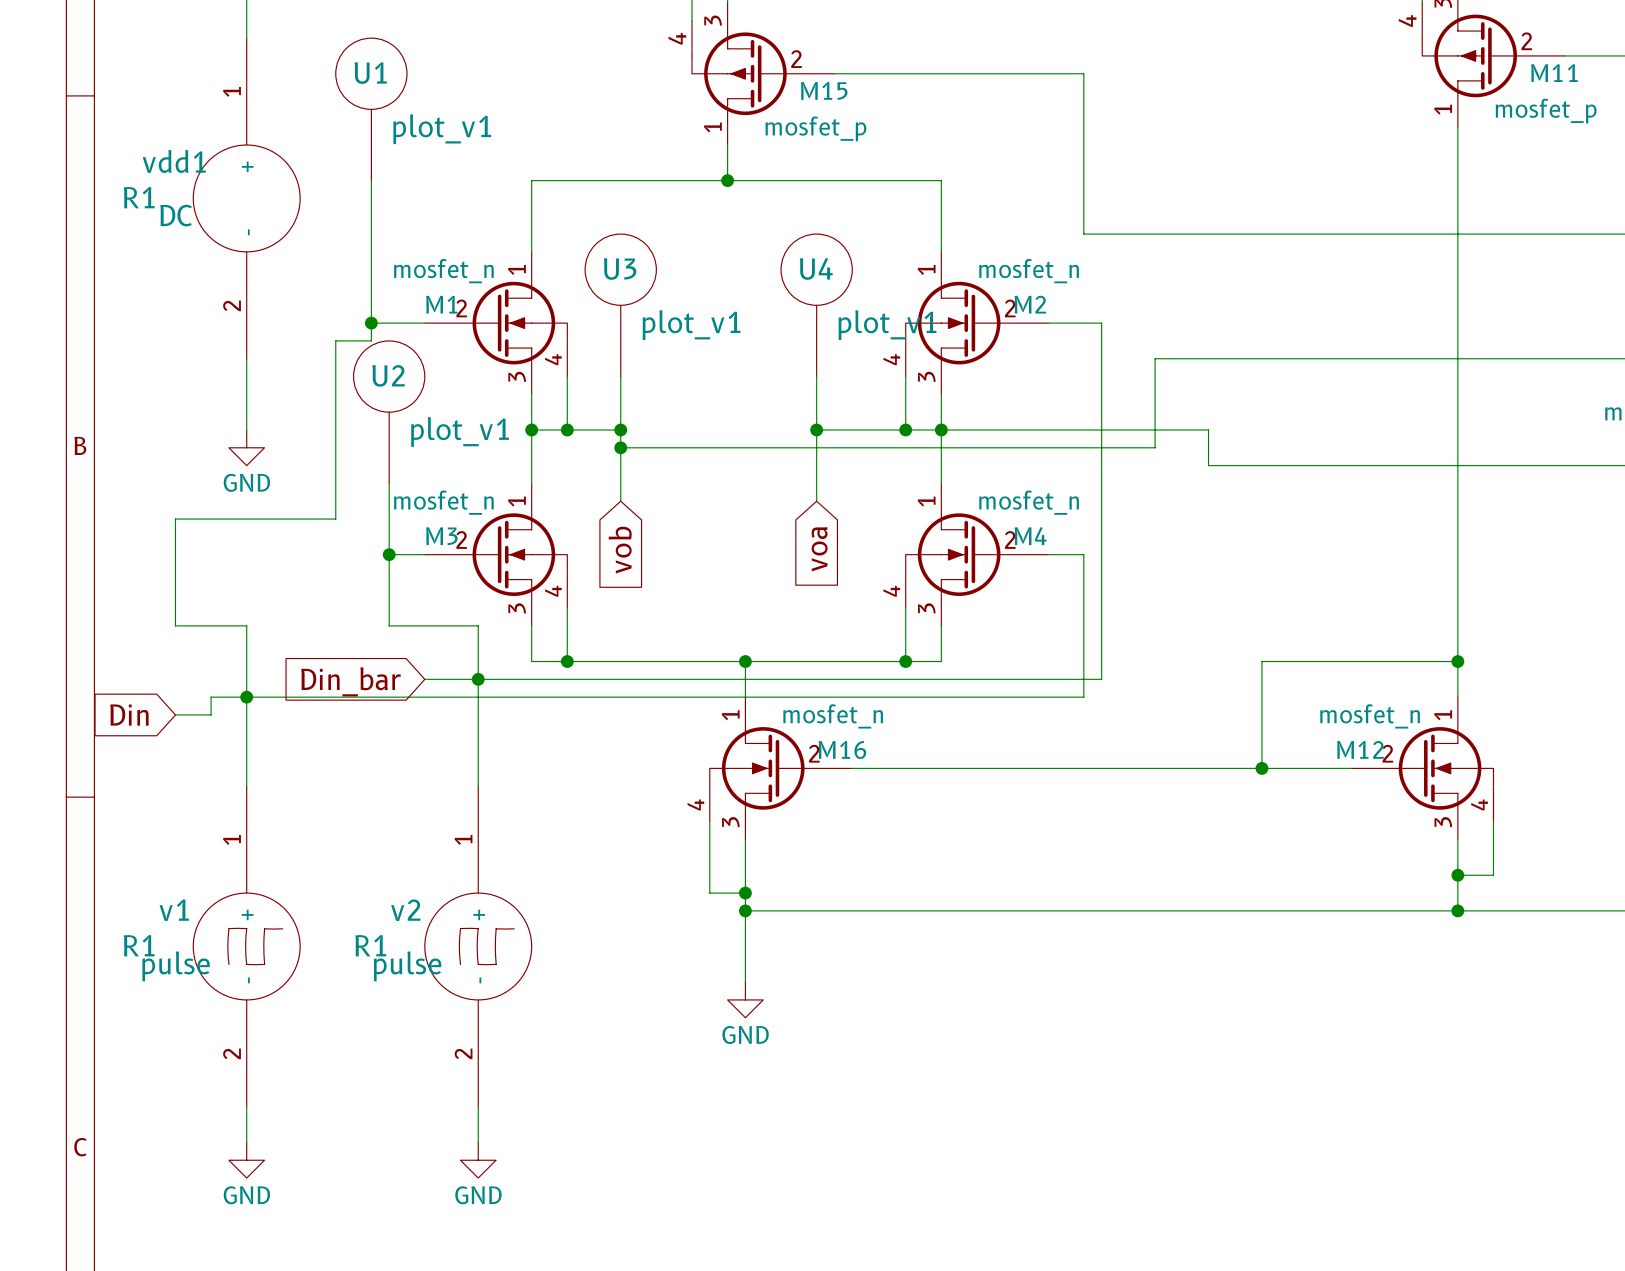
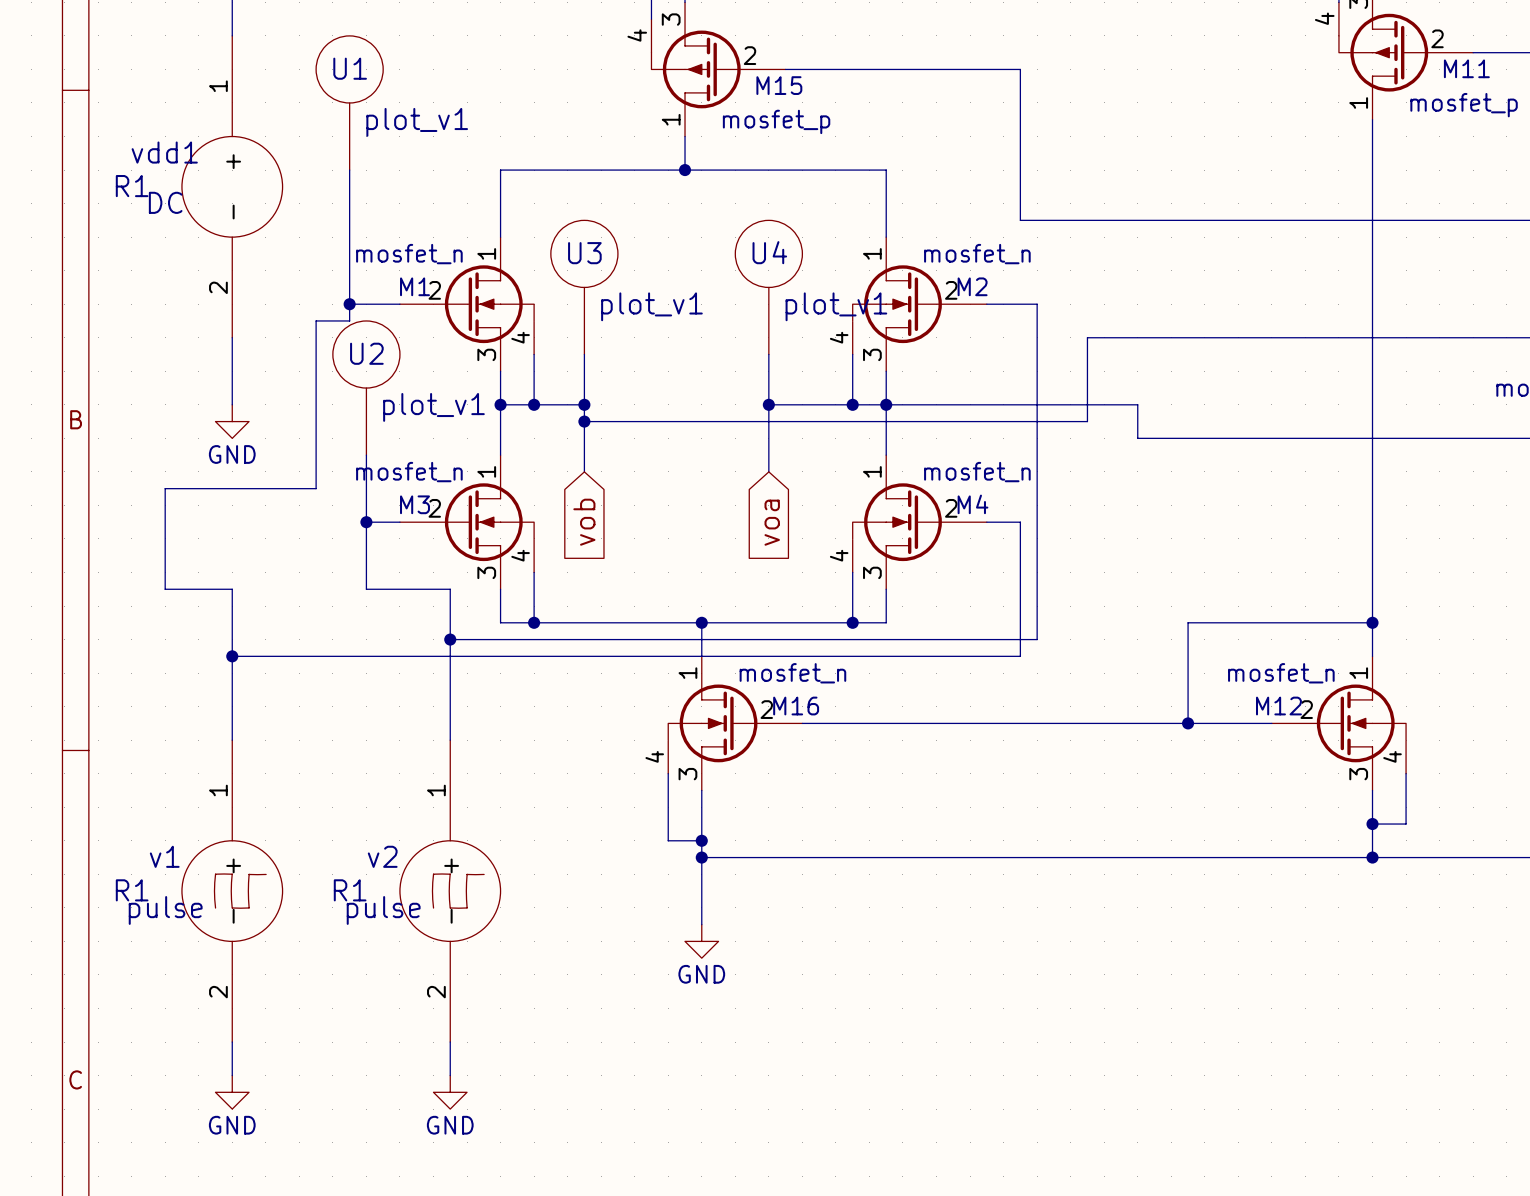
wire: (424, 679) (478, 679) -> none
global label: Din_bar (351, 681) -> none
wire: (246, 697) (211, 697) (211, 714) (175, 714) -> none
global label: Din (129, 715) -> none

